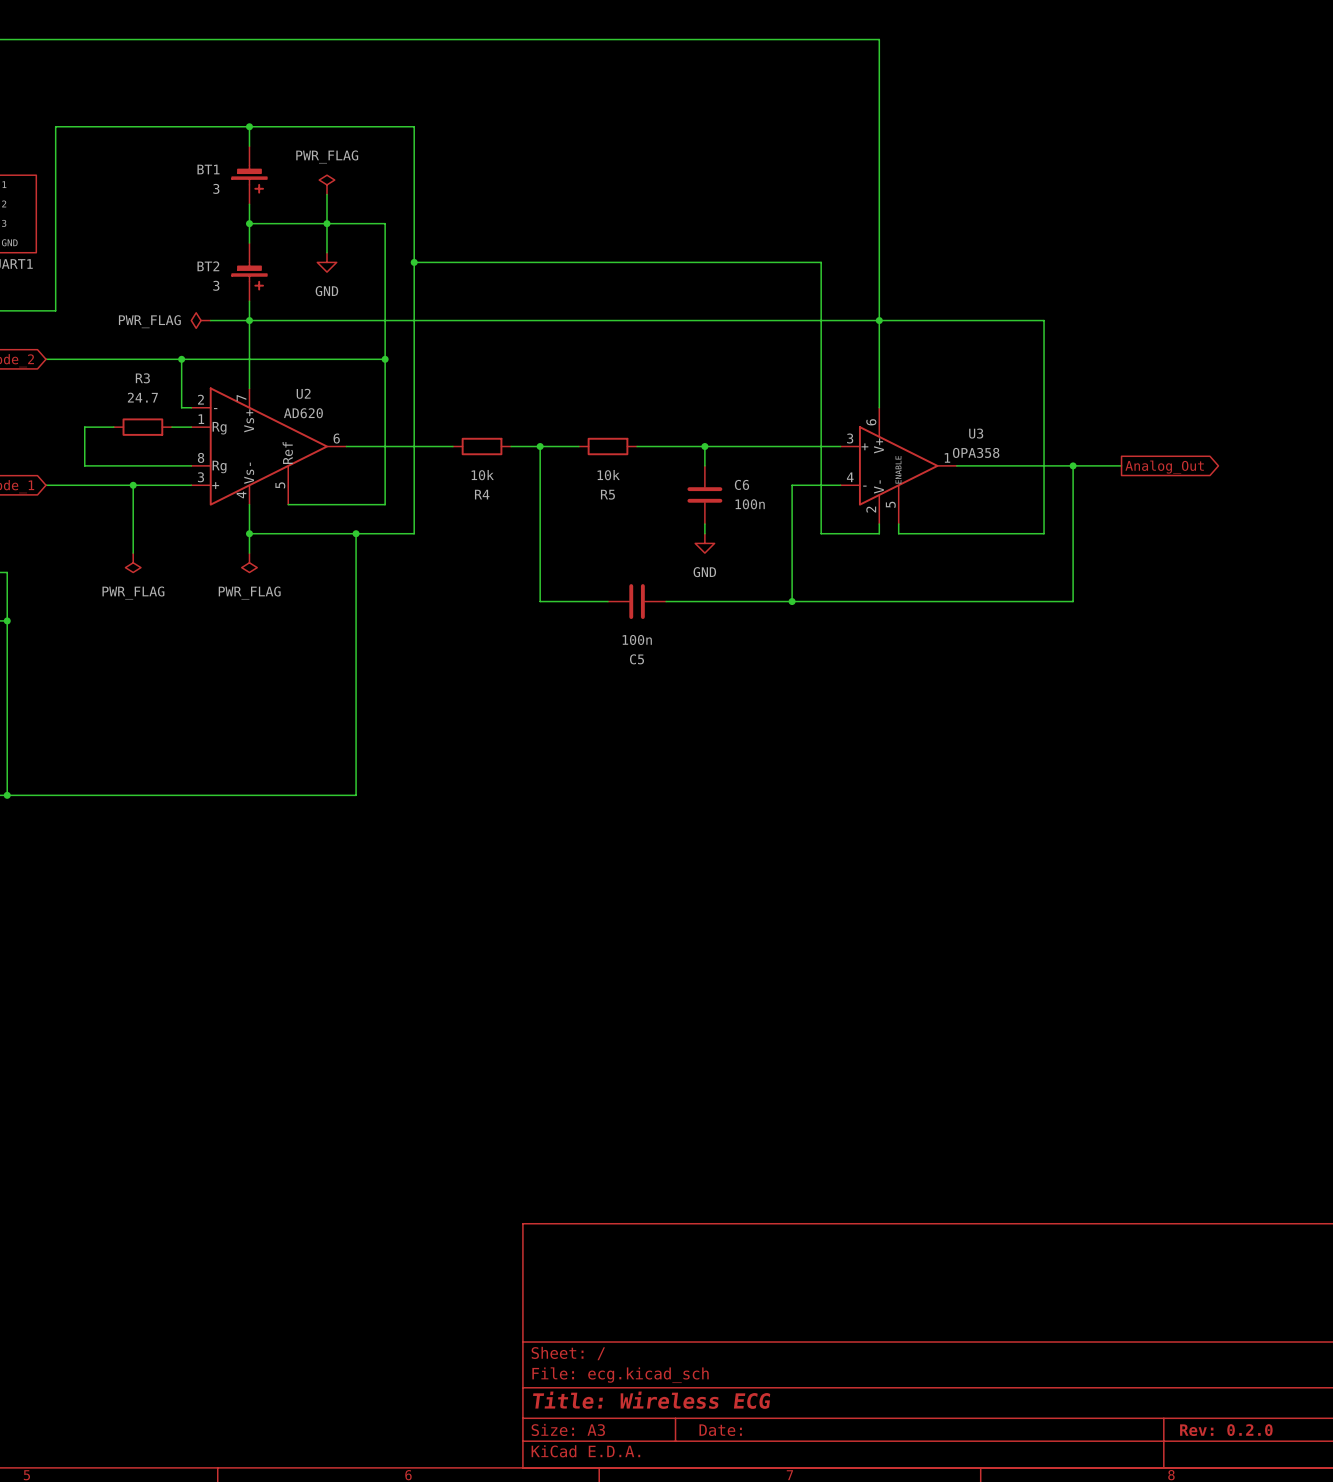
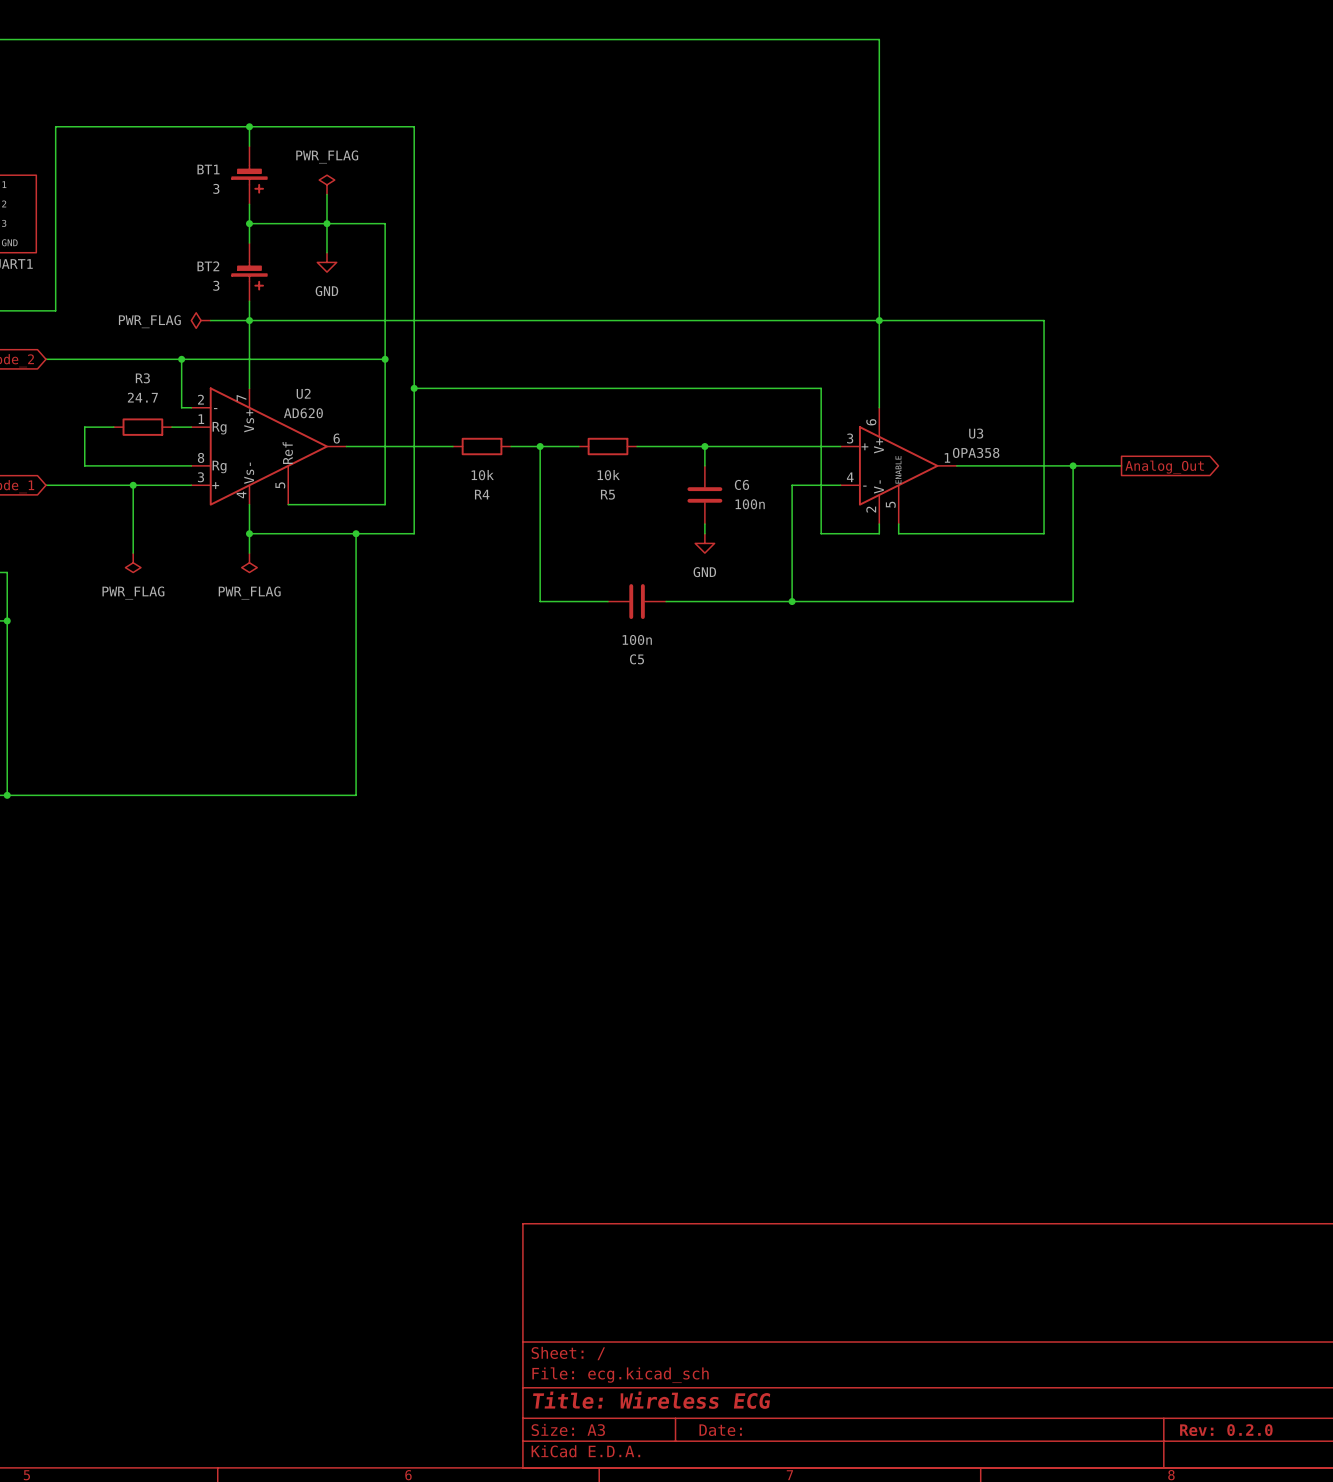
wire: (414, 262) (821, 262) (821, 388) -> (414, 388) (821, 388)
junction: (414, 262) -> none
junction: none -> (414, 388)

